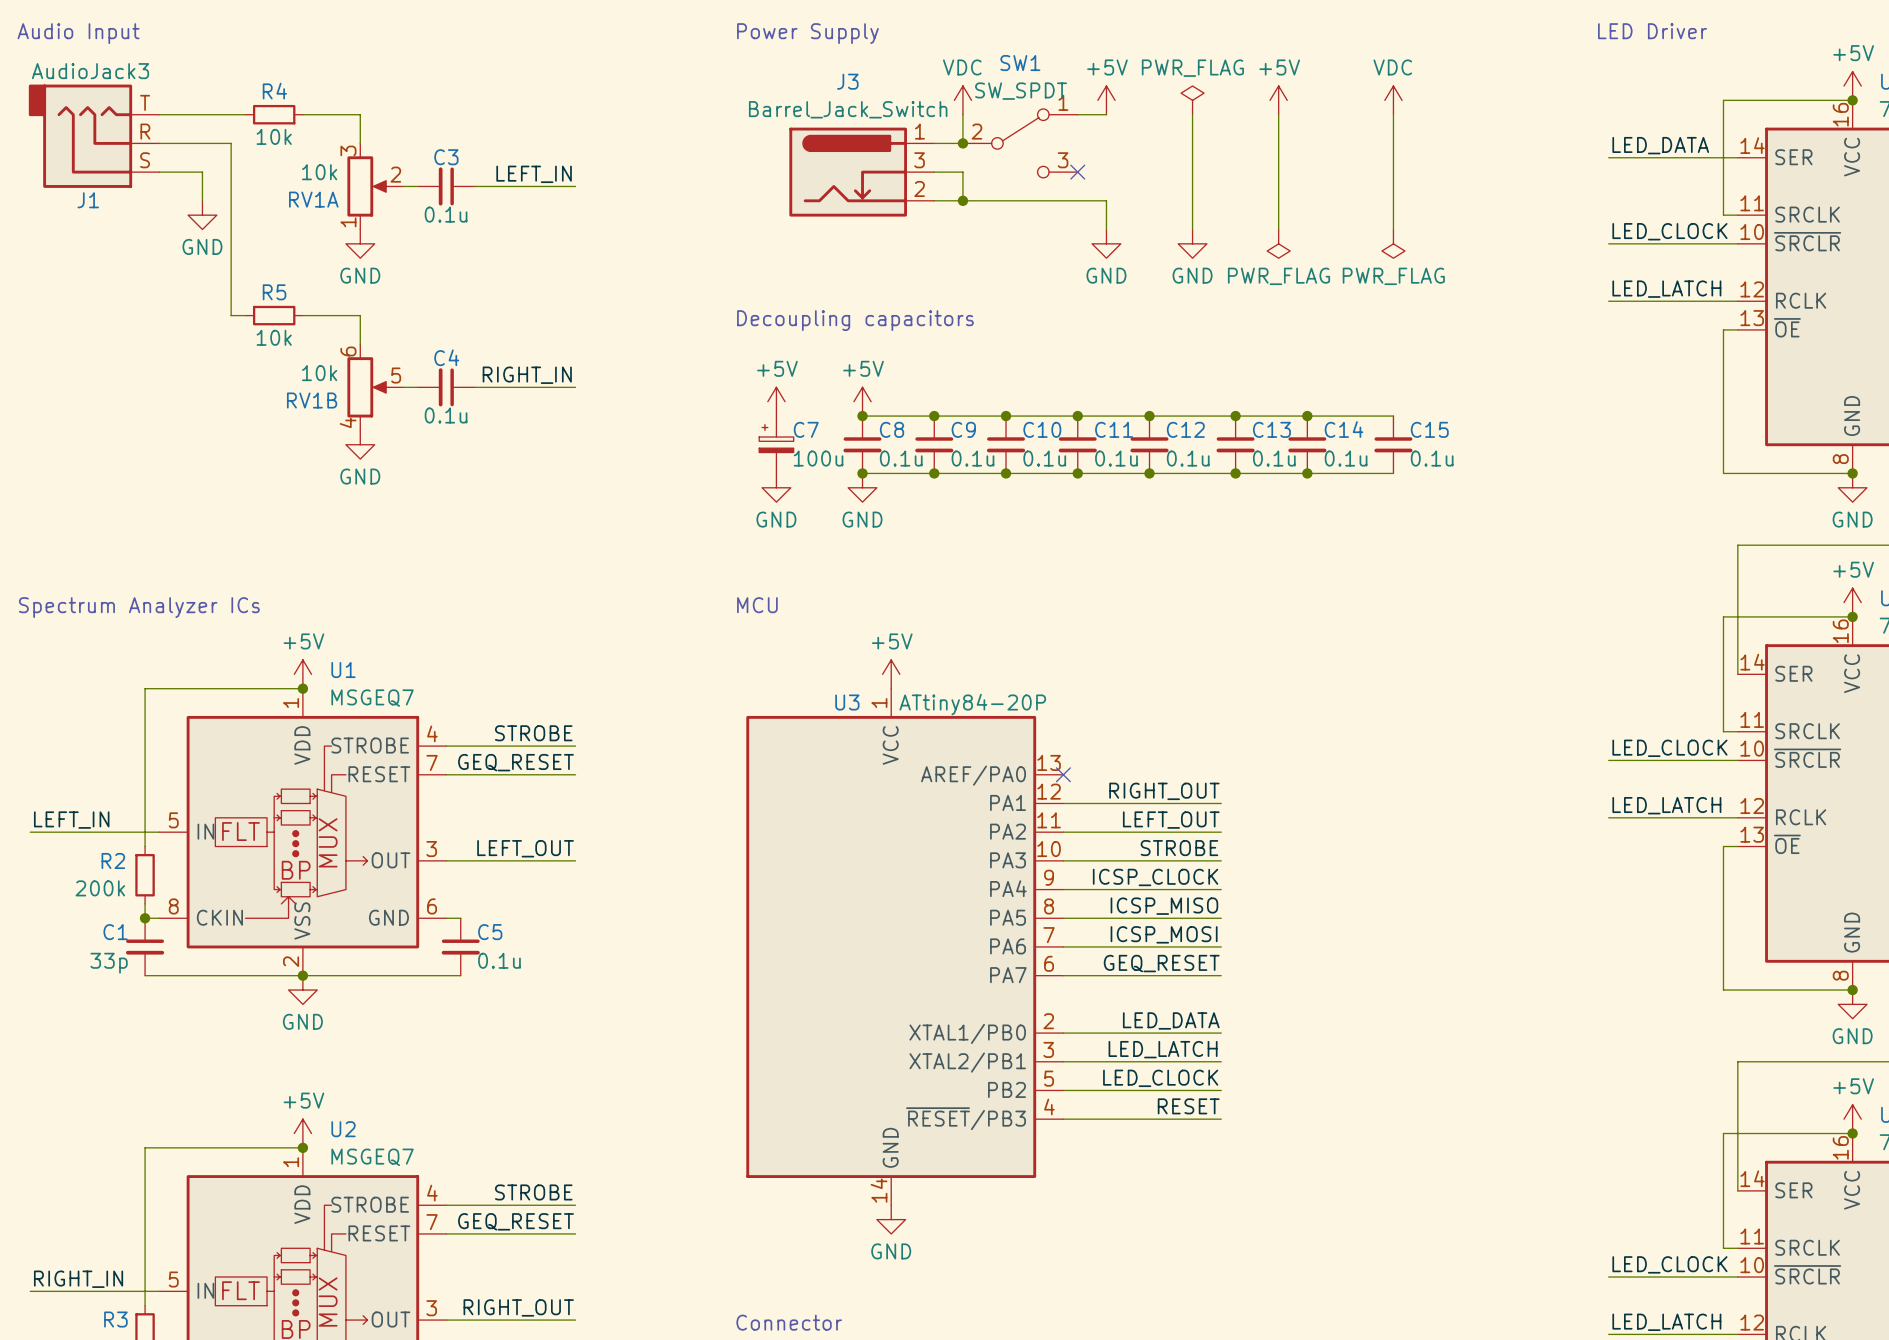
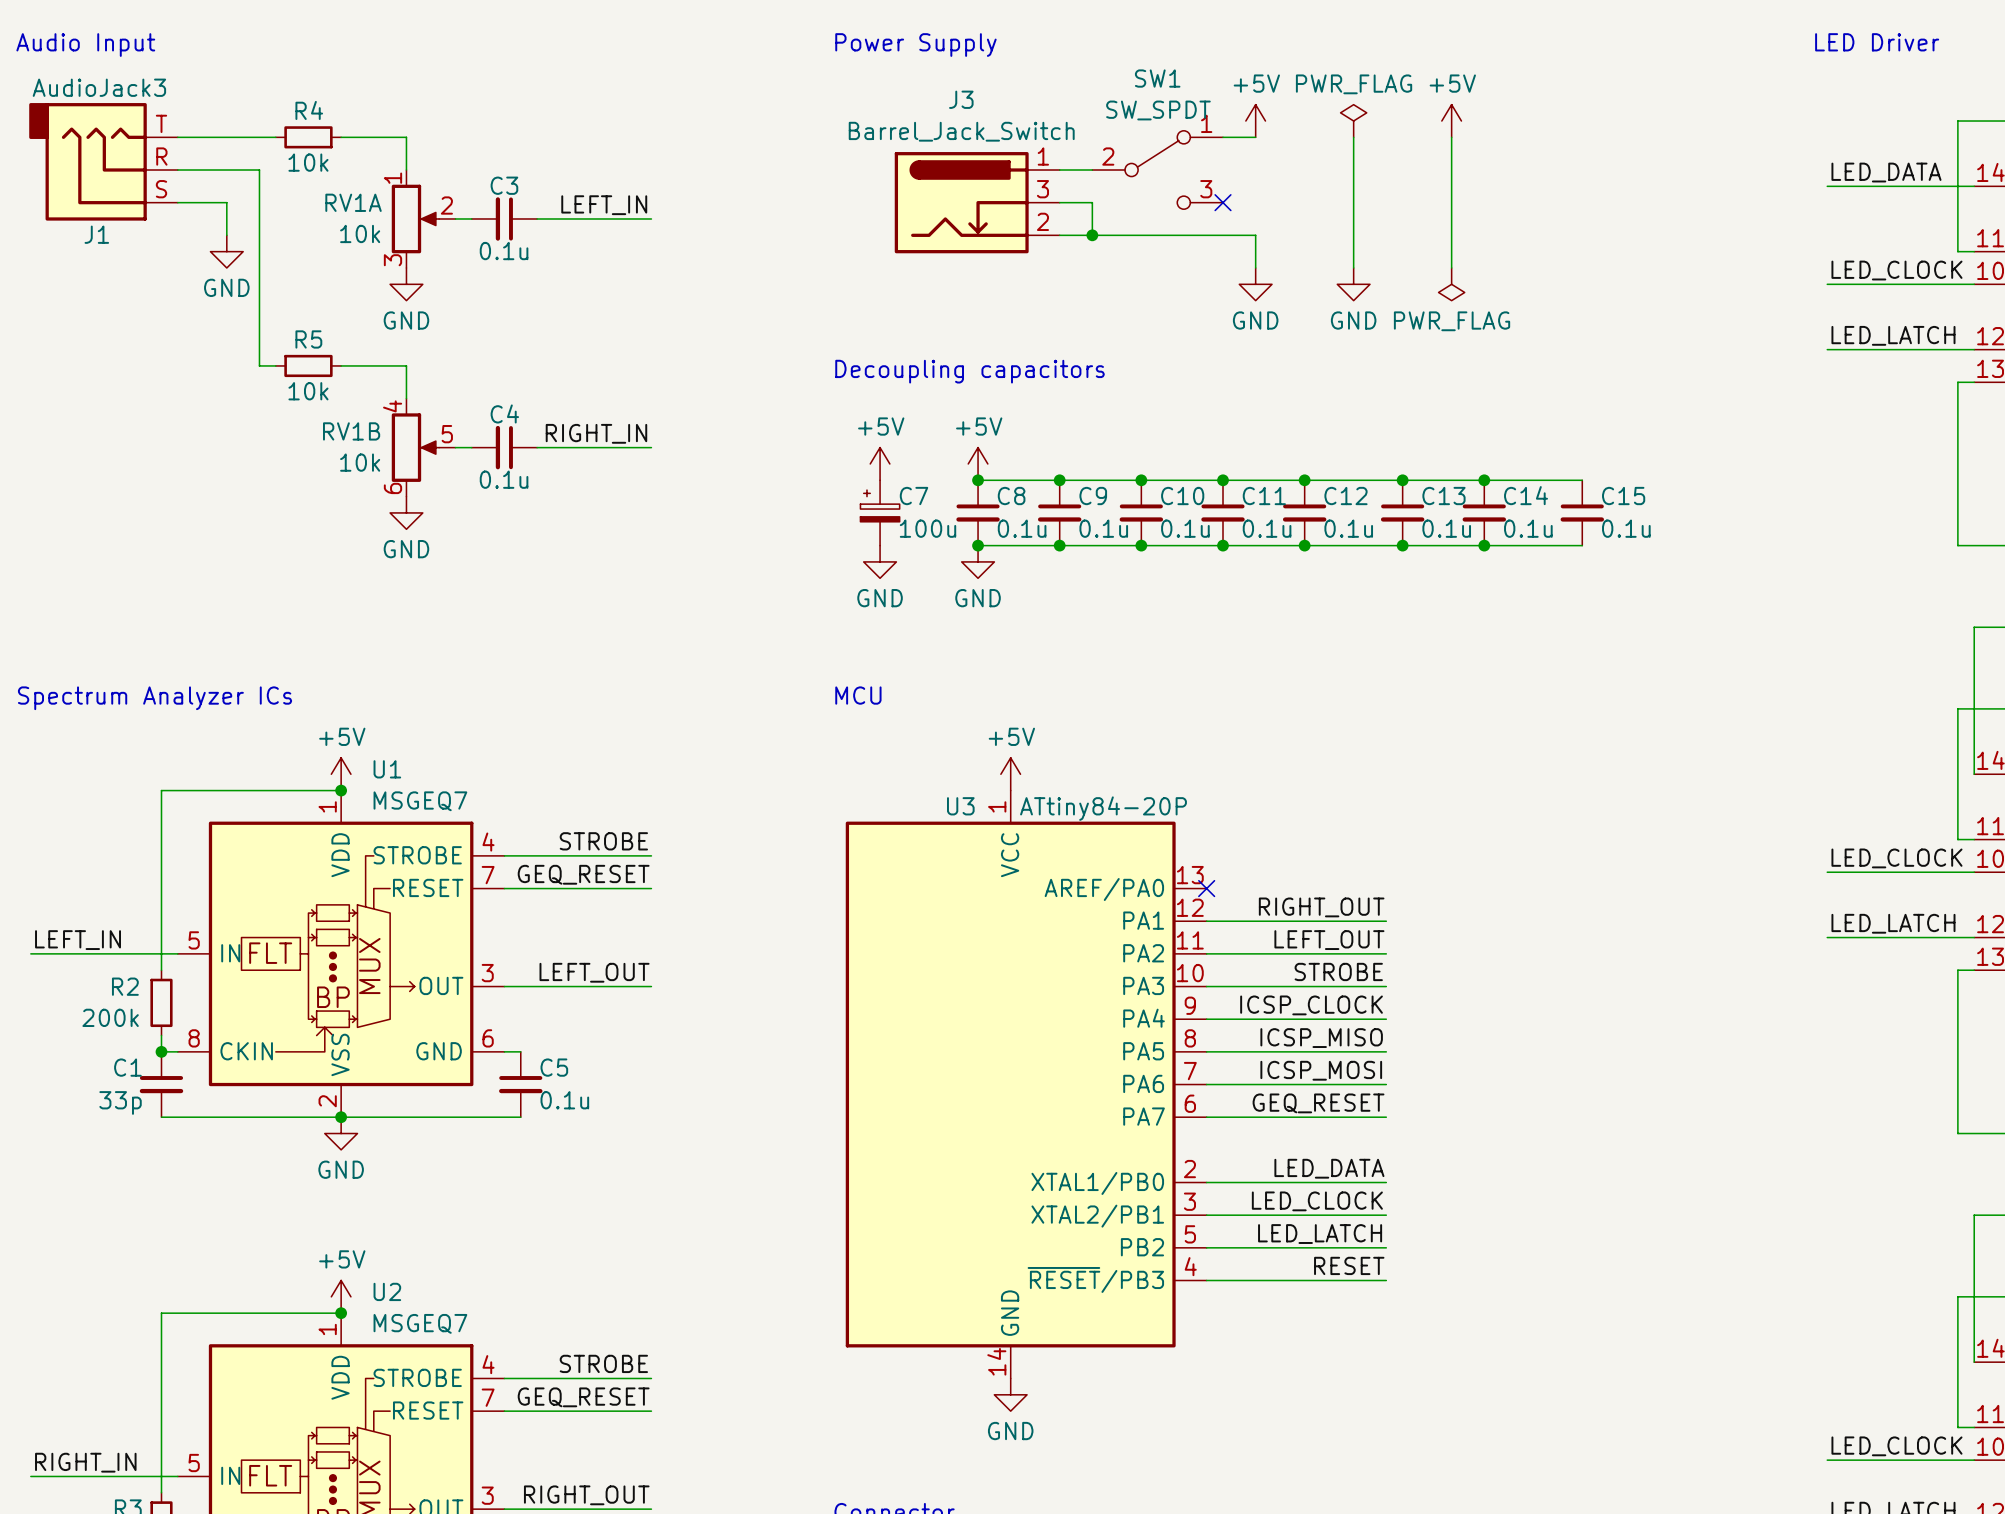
power symbol: VDC (962, 100) -> none
power symbol: VDC (1393, 100) -> none
wire: (962, 114) (962, 143) -> none
wire: (1393, 114) (1393, 229) -> none
junction: (962, 143) -> none
RV1A flip: as is (368, 186) -> up-down (415, 218)
power symbol: PWR_FLAG (1393, 243) -> none
RV1B flip: as is (368, 387) -> up-down (415, 447)
label: LED_LATCH (1163, 1049) -> LED_CLOCK (1317, 1201)
label: LED_CLOCK (1160, 1078) -> LED_LATCH (1320, 1234)

